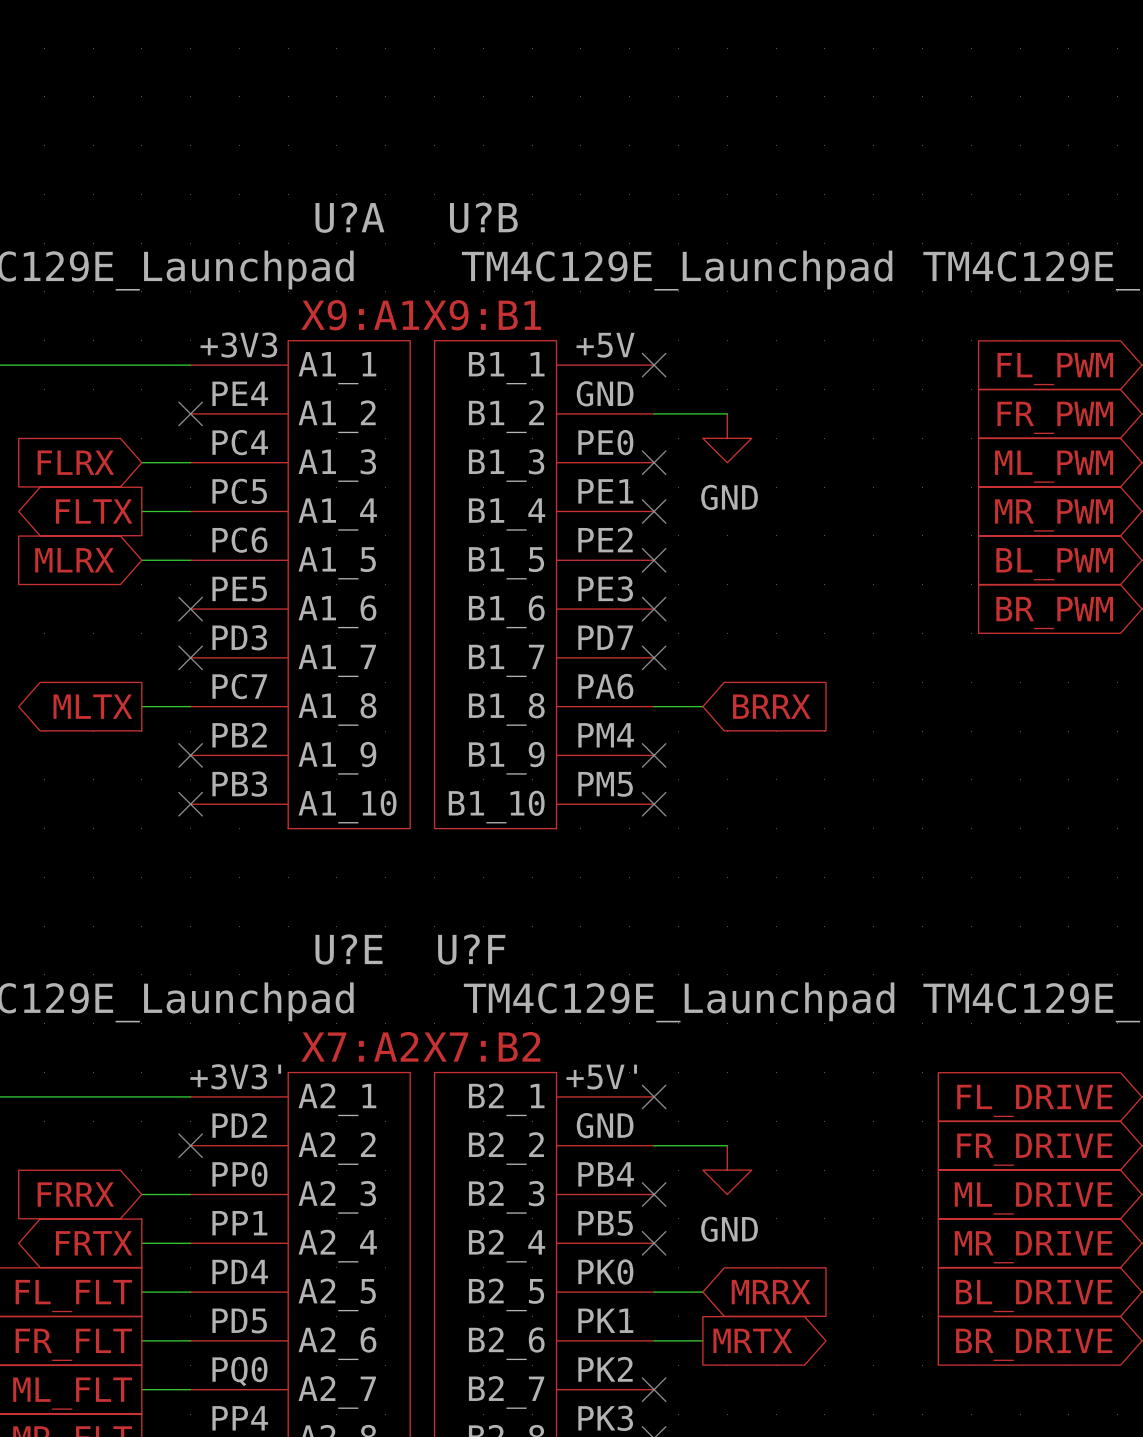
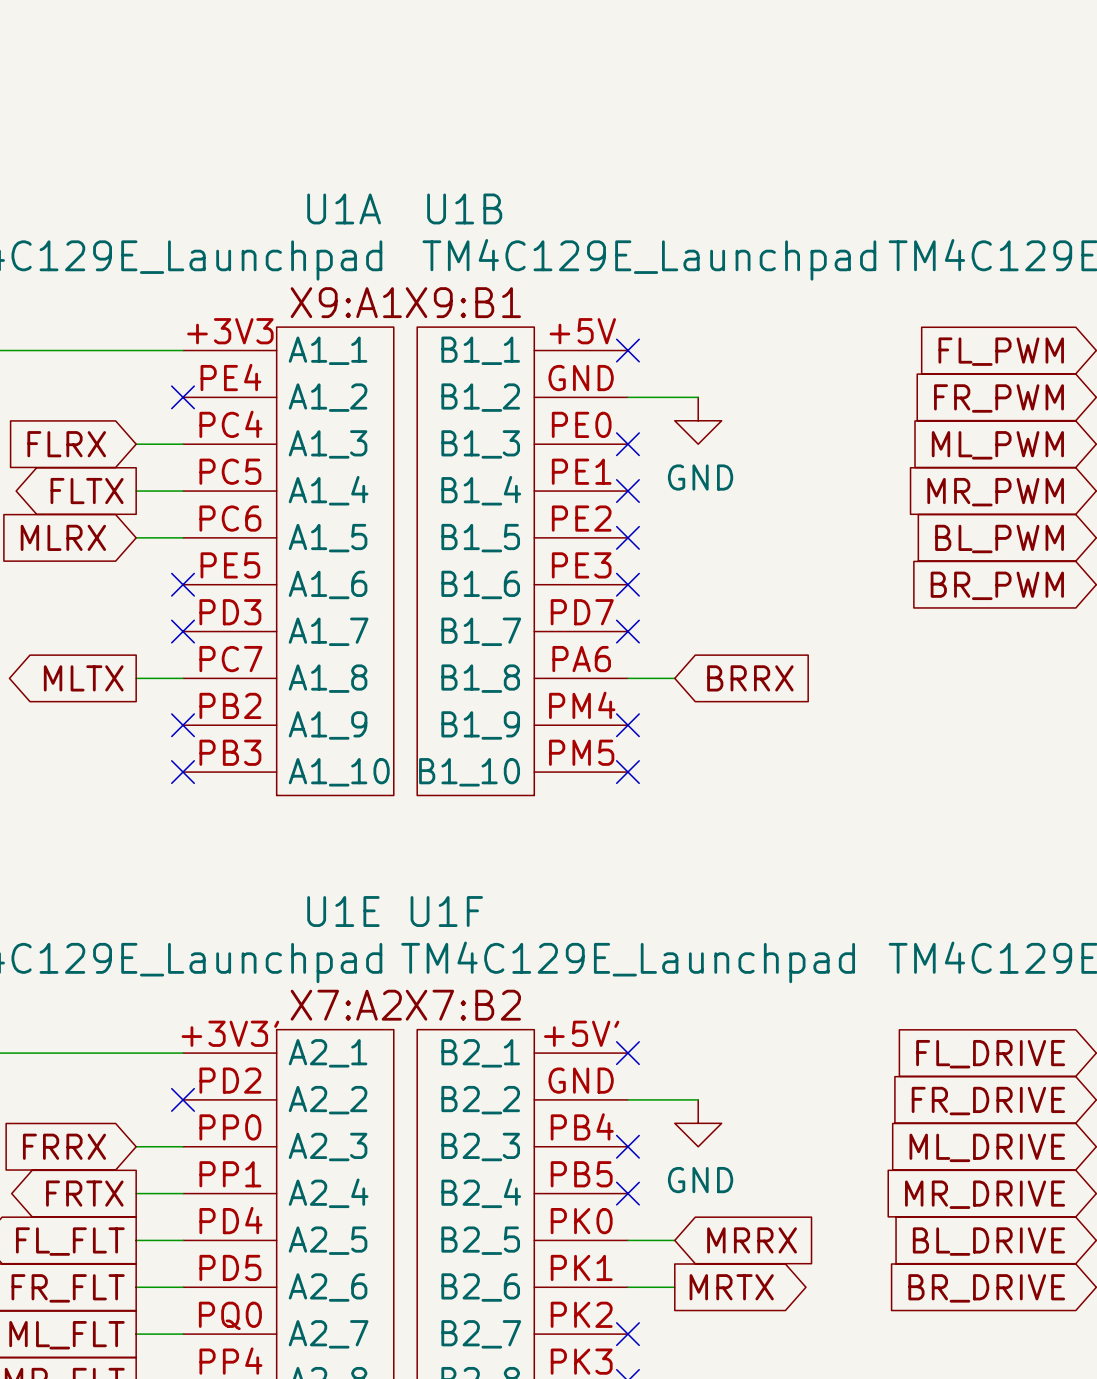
U?A name: U?A (349, 217) -> U1A (344, 208)
U?B name: U?B (483, 217) -> U1B (464, 208)
U?E name: U?E (349, 949) -> U1E (343, 911)
U?F name: U?F (471, 949) -> U1F (446, 911)

